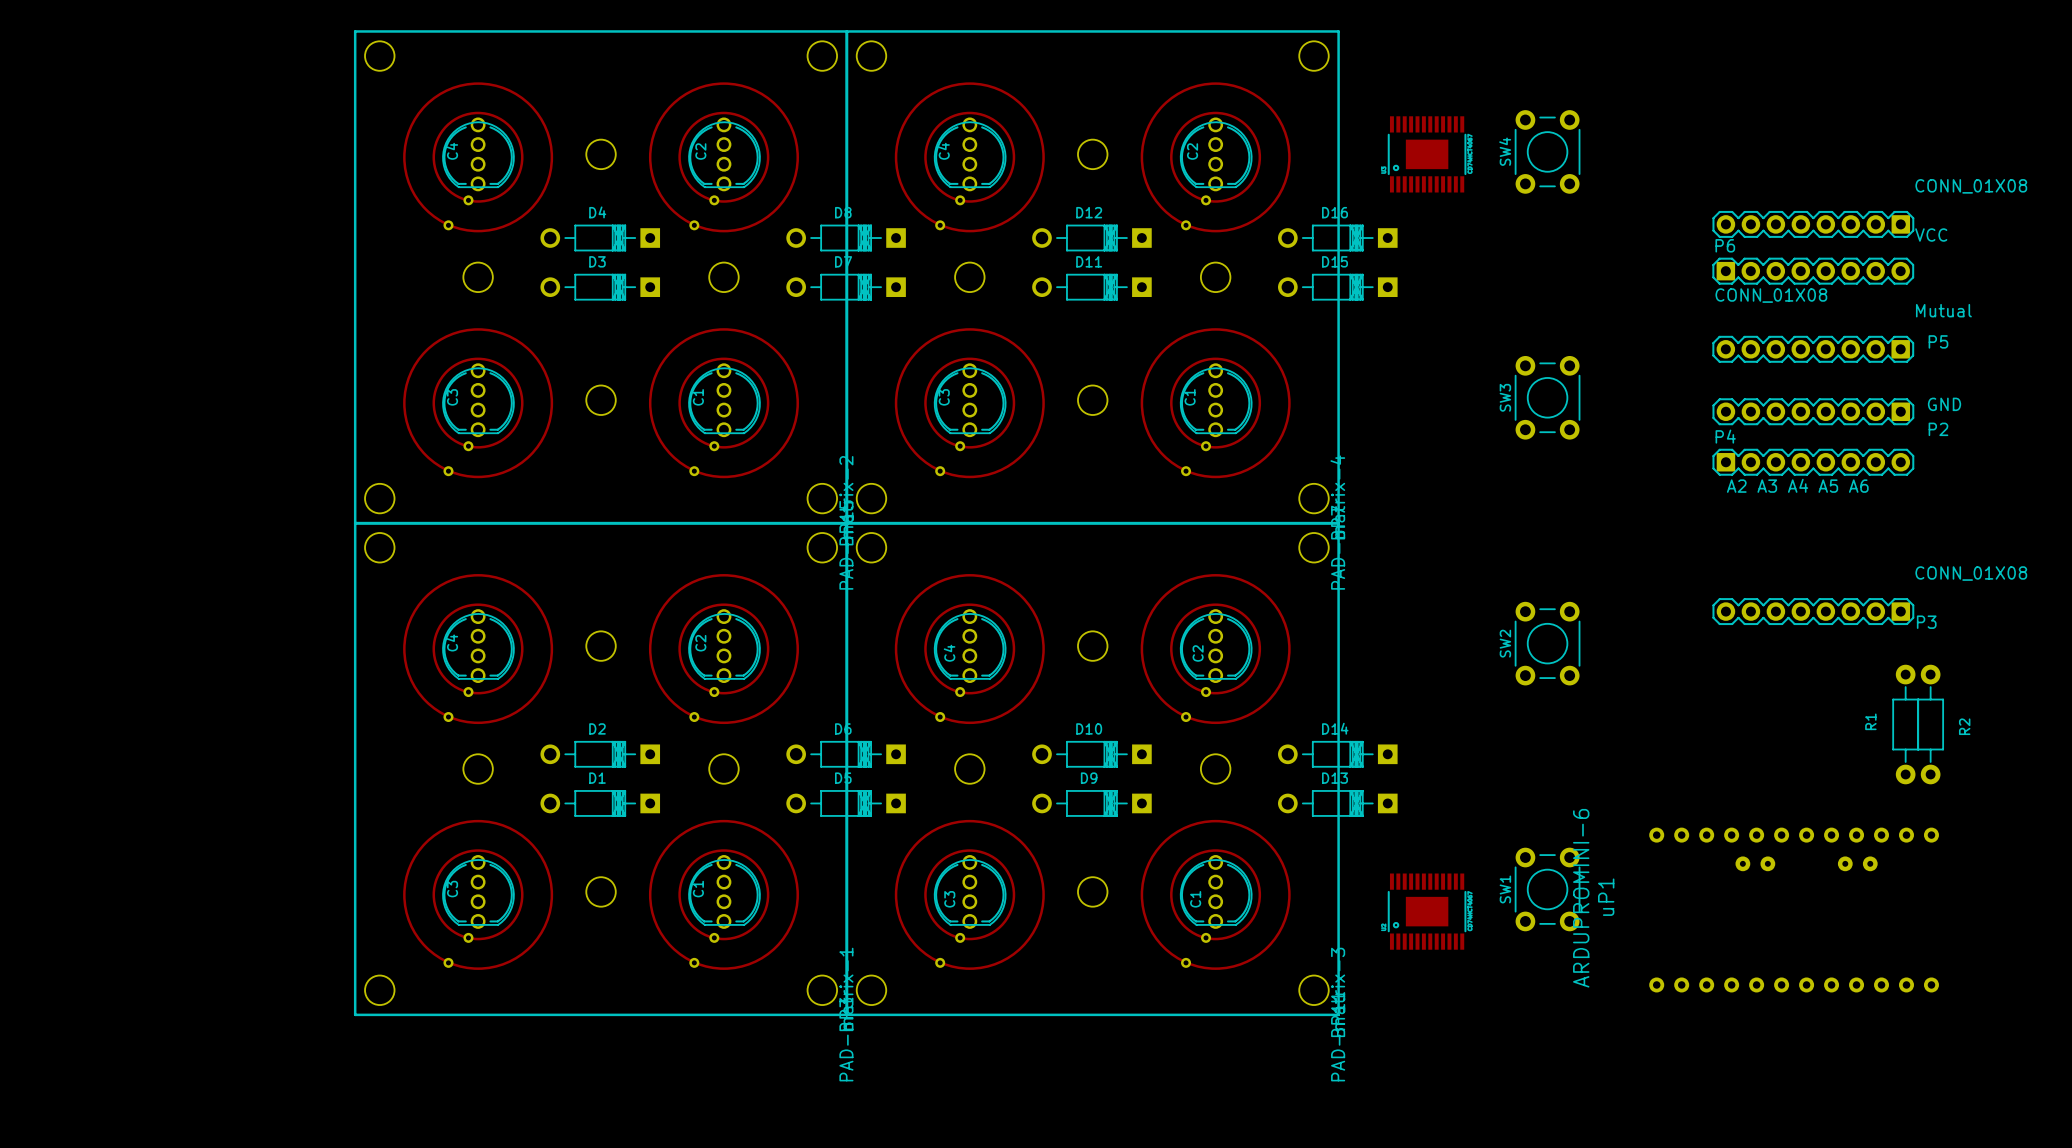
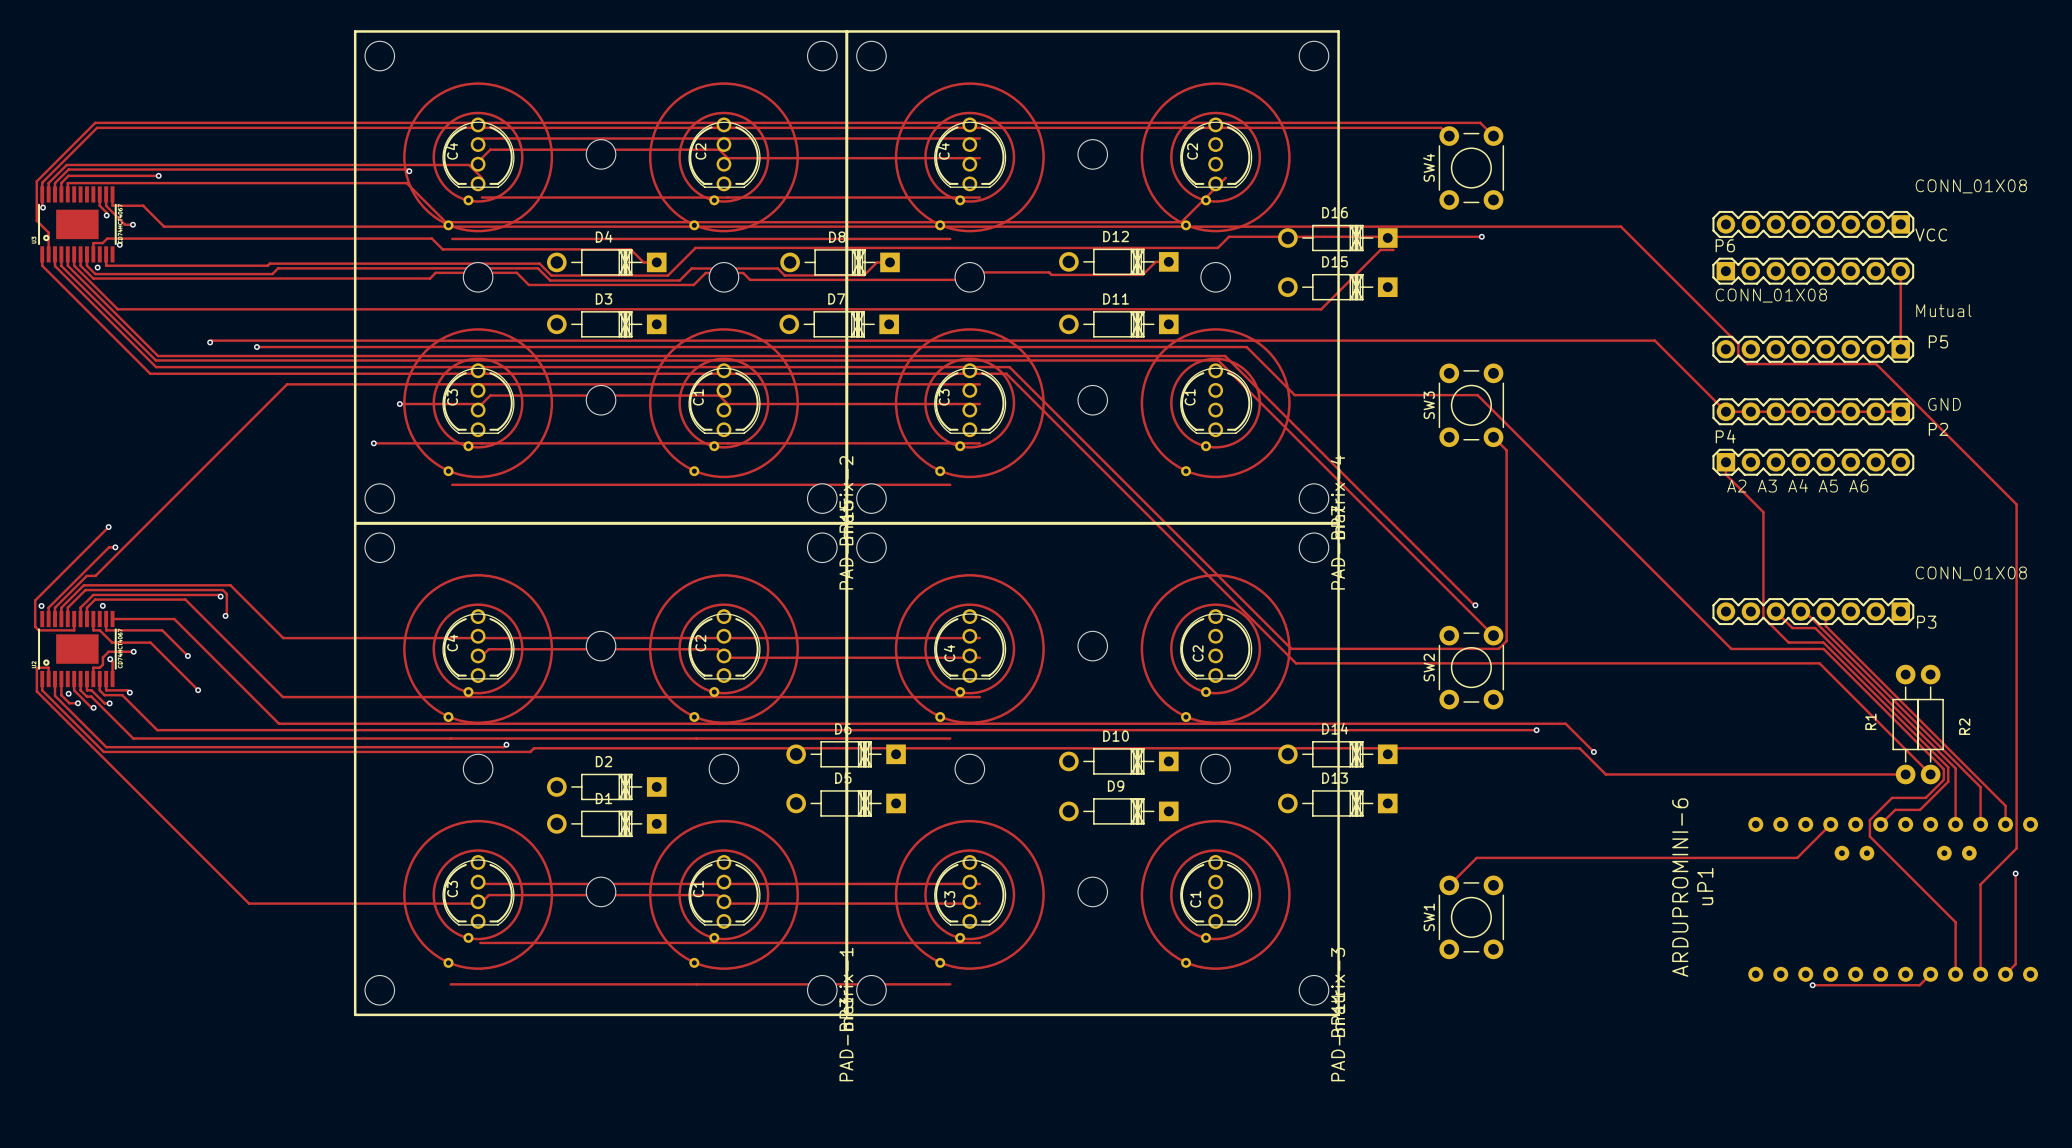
track: none -> (1449, 136) (1441, 127) (97, 127) (42, 182) (43, 207)
track: none -> (1493, 136) (1480, 122) (95, 122) (36, 181) (36, 220) (48, 232) (48, 254)
track: none -> (481, 138) (979, 138)
SW4 position: (1547, 151) -> (1471, 168)
part position: (1427, 154) -> (77, 224)
track: none -> (481, 158) (490, 149) (719, 149) (727, 158) (979, 158)
track: none -> (409, 171) (407, 169) (68, 169) (55, 183) (55, 194)
via: none -> (409, 171)
track: none -> (158, 175) (68, 175) (61, 182) (61, 194)
via: none -> (158, 175)
track: none -> (481, 177) (469, 165) (66, 165) (48, 183) (48, 194)
track: none -> (1225, 177) (1181, 222) (445, 222) (406, 183) (67, 183) (67, 194)
track: none -> (99, 194) (99, 205) (106, 212) (106, 215)
track: none -> (106, 194) (106, 205) (125, 224) (132, 224)
track: none -> (112, 194) (112, 205) (143, 205) (164, 226) (1620, 226) (1738, 344) (1738, 354) (1747, 364) (1876, 364) (2016, 504) (2016, 848) (1980, 884) (1980, 974)
track: none -> (481, 197) (979, 197)
via: none -> (43, 207)
via: none -> (106, 215)
via: none -> (132, 224)
track: none -> (1481, 236) (1229, 236) (1217, 247) (695, 247) (667, 275) (551, 275) (539, 263) (106, 265) (106, 254)
via: none -> (1481, 236)
track: none -> (452, 238) (950, 238)
D4 position: (600, 238) -> (606, 262)
D8 position: (846, 238) -> (840, 262)
D12 position: (1091, 238) -> (1118, 261)
via: none -> (119, 244)
track: none -> (1393, 249) (1380, 249) (1321, 309) (117, 309) (74, 265) (74, 254)
track: none -> (42, 254) (42, 265) (150, 373) (1006, 373) (1296, 663) (1819, 663) (1930, 774)
track: none -> (55, 254) (55, 266) (156, 367) (1009, 367) (1291, 648) (1498, 648) (1506, 641) (1506, 450) (1493, 437)
track: none -> (61, 254) (61, 265) (155, 360) (1218, 360) (1493, 635)
track: none -> (67, 254) (67, 265) (158, 356) (1225, 356) (1475, 605)
track: none -> (80, 254) (80, 265) (93, 278) (430, 278) (435, 272) (516, 272) (528, 284) (693, 284) (705, 272) (743, 272) (750, 279) (957, 279) (965, 272) (1142, 274) (1155, 261) (1168, 261)
track: none -> (86, 254) (86, 265) (95, 274) (272, 274) (278, 268) (538, 268) (550, 280) (679, 280) (691, 268) (777, 268) (784, 275) (863, 275) (876, 262) (890, 262)
track: none -> (93, 254) (93, 243) (102, 243) (107, 238) (431, 238) (442, 249) (630, 249) (643, 262) (656, 262)
via: none -> (97, 267)
track: none -> (1900, 271) (1900, 349)
D3 position: (600, 287) -> (606, 324)
D7 position: (846, 287) -> (839, 324)
D11 position: (1091, 287) -> (1118, 324)
track: none -> (210, 342) (211, 340) (1654, 340) (1725, 411) (1900, 411)
via: none -> (210, 342)
track: none -> (256, 347) (1246, 347) (1294, 395) (1477, 395) (1731, 648) (1823, 648) (1943, 769) (1943, 779) (1925, 797) (1892, 797) (1869, 820) (1869, 836) (1955, 922) (1955, 974)
via: none -> (256, 347)
track: none -> (979, 384) (287, 384) (95, 575) (86, 575) (55, 607) (55, 619)
SW3 position: (1547, 397) -> (1471, 405)
track: none -> (399, 404) (481, 404) (490, 395) (719, 395) (727, 404) (979, 404)
via: none -> (399, 404)
track: none -> (373, 443) (979, 443)
via: none -> (373, 443)
track: none -> (1725, 462) (1725, 474) (1763, 512) (1763, 617) (1788, 642) (1823, 642) (1948, 767) (1948, 781) (1920, 809) (1895, 809) (1880, 824)
track: none -> (452, 484) (950, 484)
track: none -> (108, 527) (35, 600) (35, 626) (38, 630) (74, 630) (74, 619)
via: none -> (108, 527)
track: none -> (115, 547) (108, 547) (48, 607) (48, 619)
via: none -> (115, 547)
track: none -> (220, 596) (219, 594) (93, 594) (80, 607) (80, 619)
via: none -> (220, 596)
via: none -> (41, 605)
via: none -> (102, 605)
via: none -> (1475, 605)
track: none -> (1775, 611) (1792, 628) (1815, 628) (1955, 768) (1955, 824)
track: none -> (1800, 611) (1805, 611) (1980, 787) (1980, 824)
track: none -> (1825, 611) (1825, 626) (2005, 805) (2005, 824)
track: none -> (225, 615) (226, 593) (222, 590) (85, 590) (67, 607) (67, 619)
via: none -> (225, 615)
track: none -> (61, 619) (61, 607) (83, 585) (230, 585) (283, 638) (979, 638)
track: none -> (86, 619) (86, 607) (95, 599) (185, 599) (282, 697) (979, 697)
track: none -> (93, 619) (93, 630) (99, 630) (112, 642) (150, 642) (198, 690)
track: none -> (106, 619) (106, 630) (162, 630) (187, 655)
track: none -> (112, 619) (174, 619) (278, 723) (1565, 723) (1593, 751)
SW2 position: (1547, 643) -> (1471, 667)
track: none -> (133, 651) (108, 651) (102, 657) (102, 664) (99, 667) (93, 667) (93, 679)
via: none -> (133, 651)
via: none -> (187, 655)
track: none -> (480, 657) (488, 649) (717, 649) (726, 657) (979, 657)
track: none -> (110, 659) (112, 661) (112, 679)
via: none -> (110, 659)
track: none -> (42, 679) (42, 690) (103, 751) (530, 751) (534, 748) (1579, 748) (1605, 774) (1905, 774)
track: none -> (48, 679) (48, 667) (36, 669) (36, 691) (249, 903) (480, 903) (488, 895) (717, 895) (726, 903) (979, 903)
track: none -> (55, 679) (55, 695) (106, 747) (504, 747) (506, 744)
track: none -> (61, 679) (61, 695) (69, 703) (77, 703)
track: none -> (74, 679) (74, 690) (93, 707)
track: none -> (80, 679) (80, 690) (86, 696) (91, 696) (133, 738) (950, 738)
track: none -> (86, 679) (86, 690) (91, 690) (104, 703) (109, 703)
track: none -> (99, 679) (99, 690) (104, 695) (122, 695) (157, 730) (1536, 730)
track: none -> (106, 679) (106, 690) (127, 690) (129, 692)
via: none -> (198, 690)
via: none -> (129, 692)
via: none -> (68, 693)
via: none -> (77, 703)
via: none -> (109, 703)
via: none -> (93, 707)
via: none -> (1536, 730)
D2 footprint: [540, 741, 661, 768] -> [546, 773, 667, 801]
via: none -> (506, 744)
via: none -> (1593, 751)
D10 position: (1091, 754) -> (1118, 761)
D1 position: (600, 803) -> (606, 823)
D9 position: (1091, 803) -> (1118, 811)
track: none -> (1830, 824) (1797, 857) (1476, 857) (1449, 885)
track: none -> (2015, 873) (2015, 964) (2005, 974)
via: none -> (2015, 873)
track: none -> (480, 883) (979, 883)
SW1 position: (1547, 889) -> (1471, 917)
uP1 position: (1794, 910) -> (1893, 899)
part position: (1427, 911) -> (77, 649)
track: none -> (480, 942) (979, 942)
track: none -> (1930, 974) (1919, 985) (1812, 985)
track: none -> (450, 984) (950, 984)
via: none -> (1812, 985)

